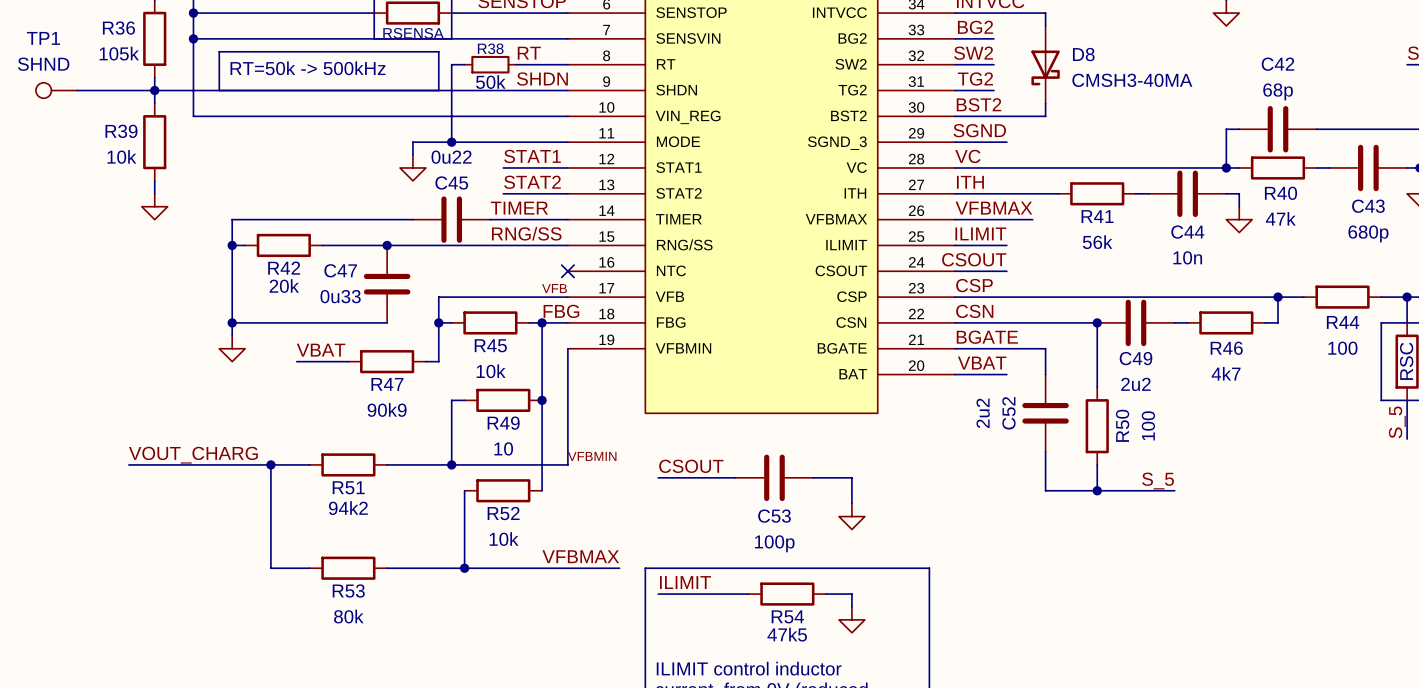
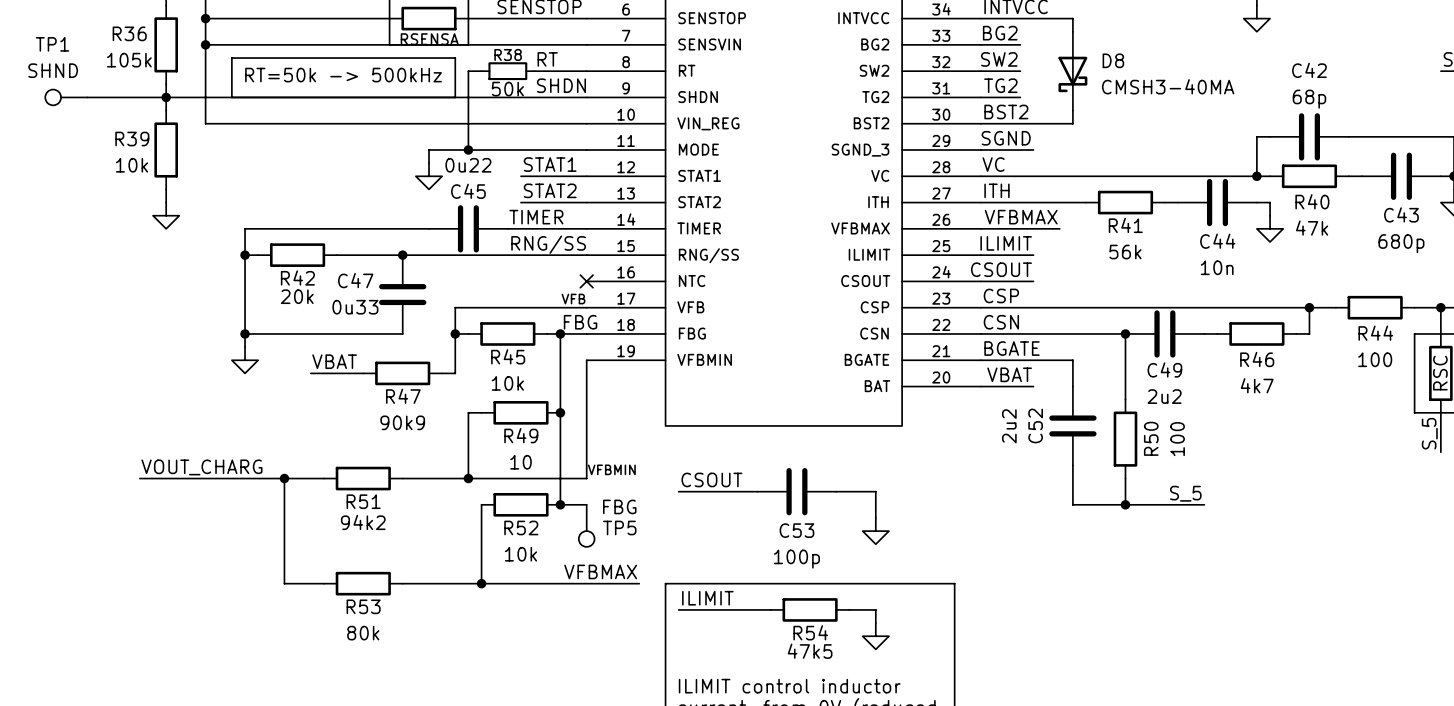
wire: none -> (560, 504) (586, 504)
junction: none -> (560, 504)
TP5: none -> FBG (586, 525)

